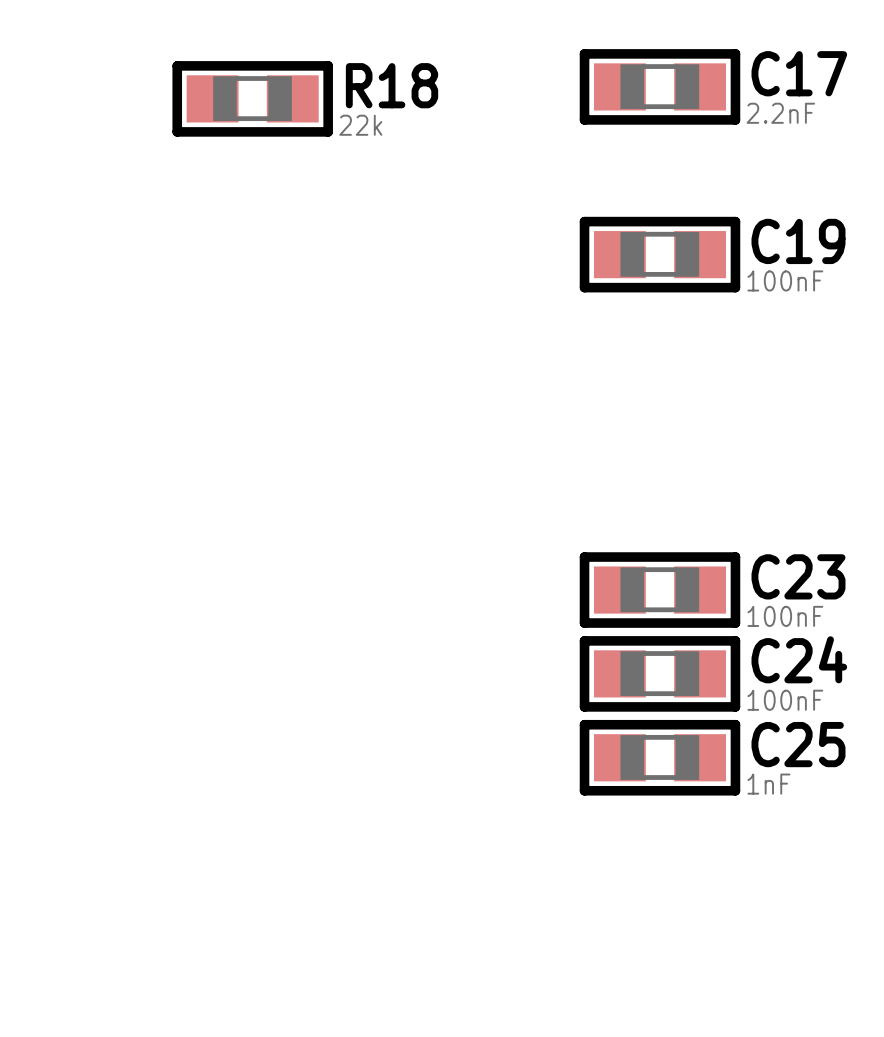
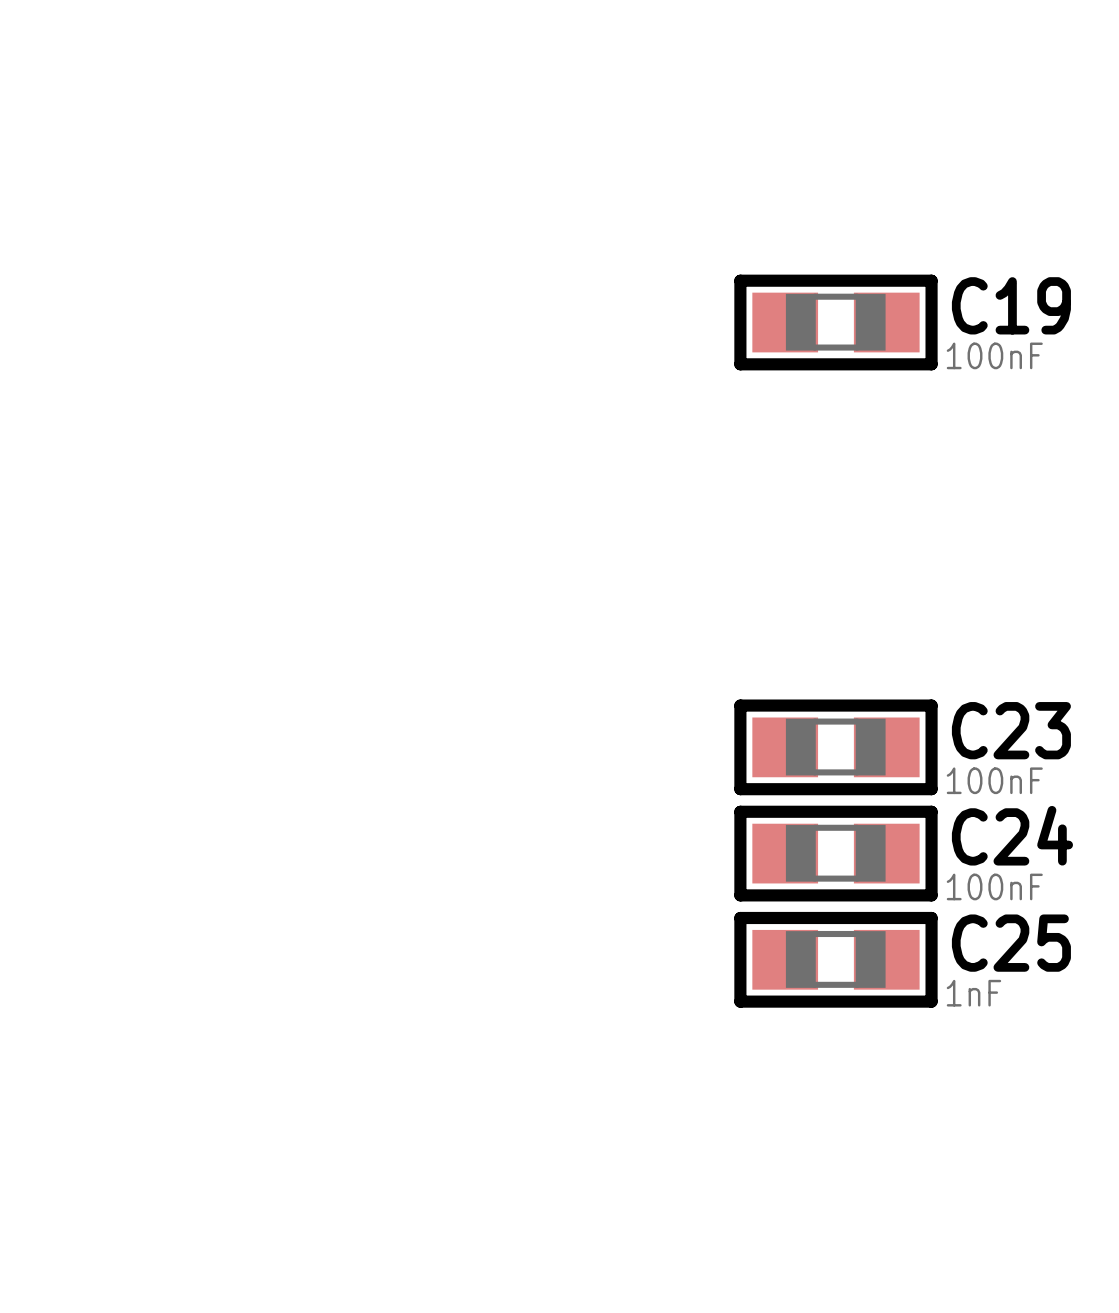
C17: 2.2nF (659, 86) -> none
R18: 22k (252, 98) -> none

